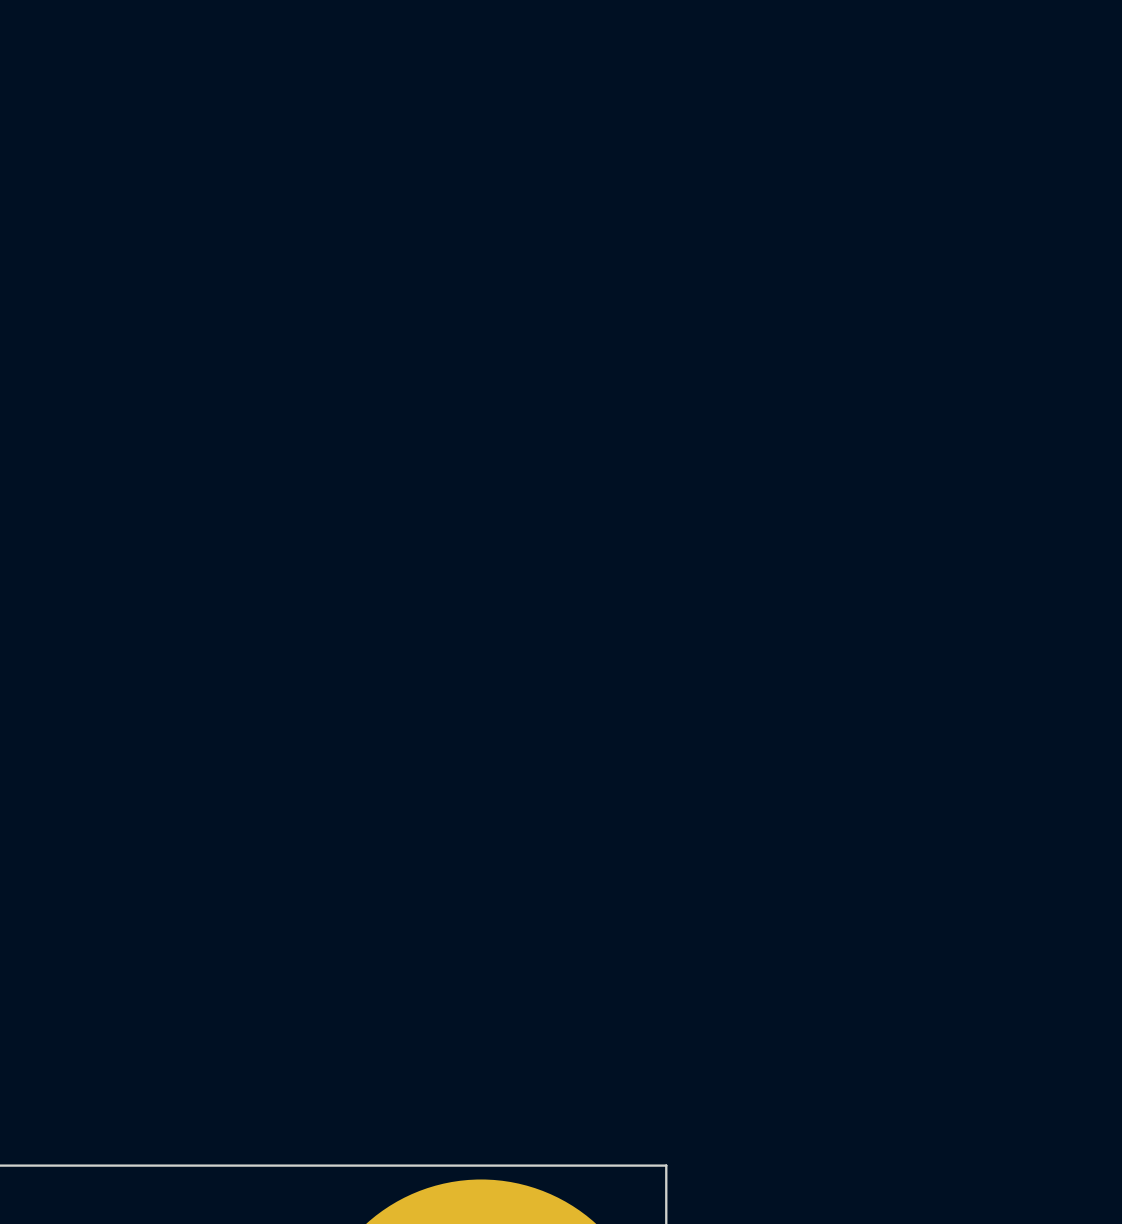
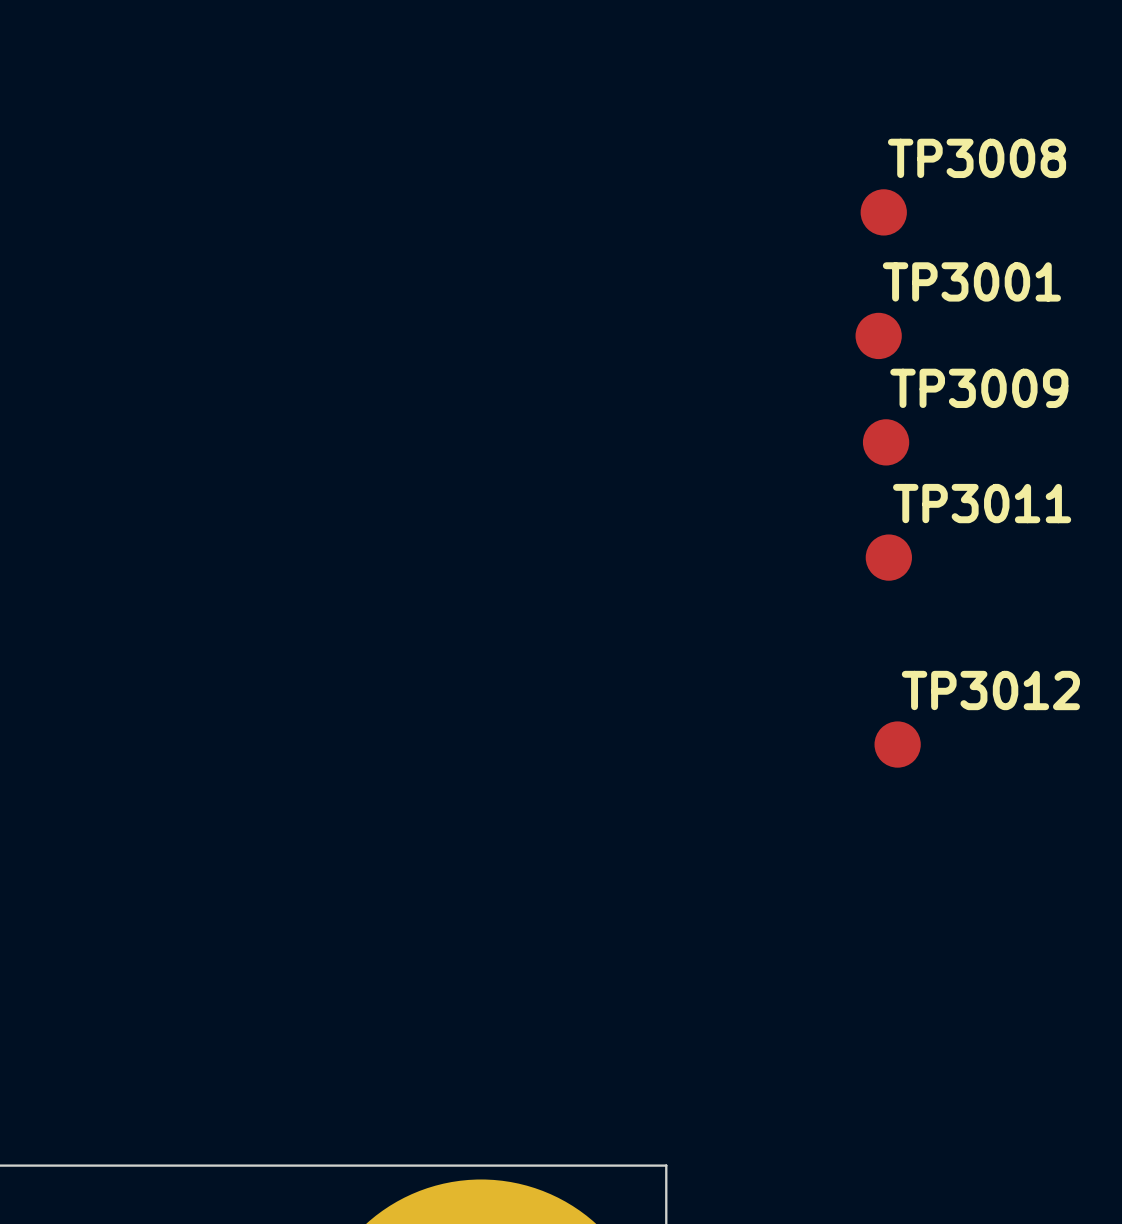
TP3008: none -> (883, 212)
TP3001: none -> (878, 335)
TP3009: none -> (886, 442)
TP3011: none -> (888, 557)
TP3012: none -> (897, 744)

